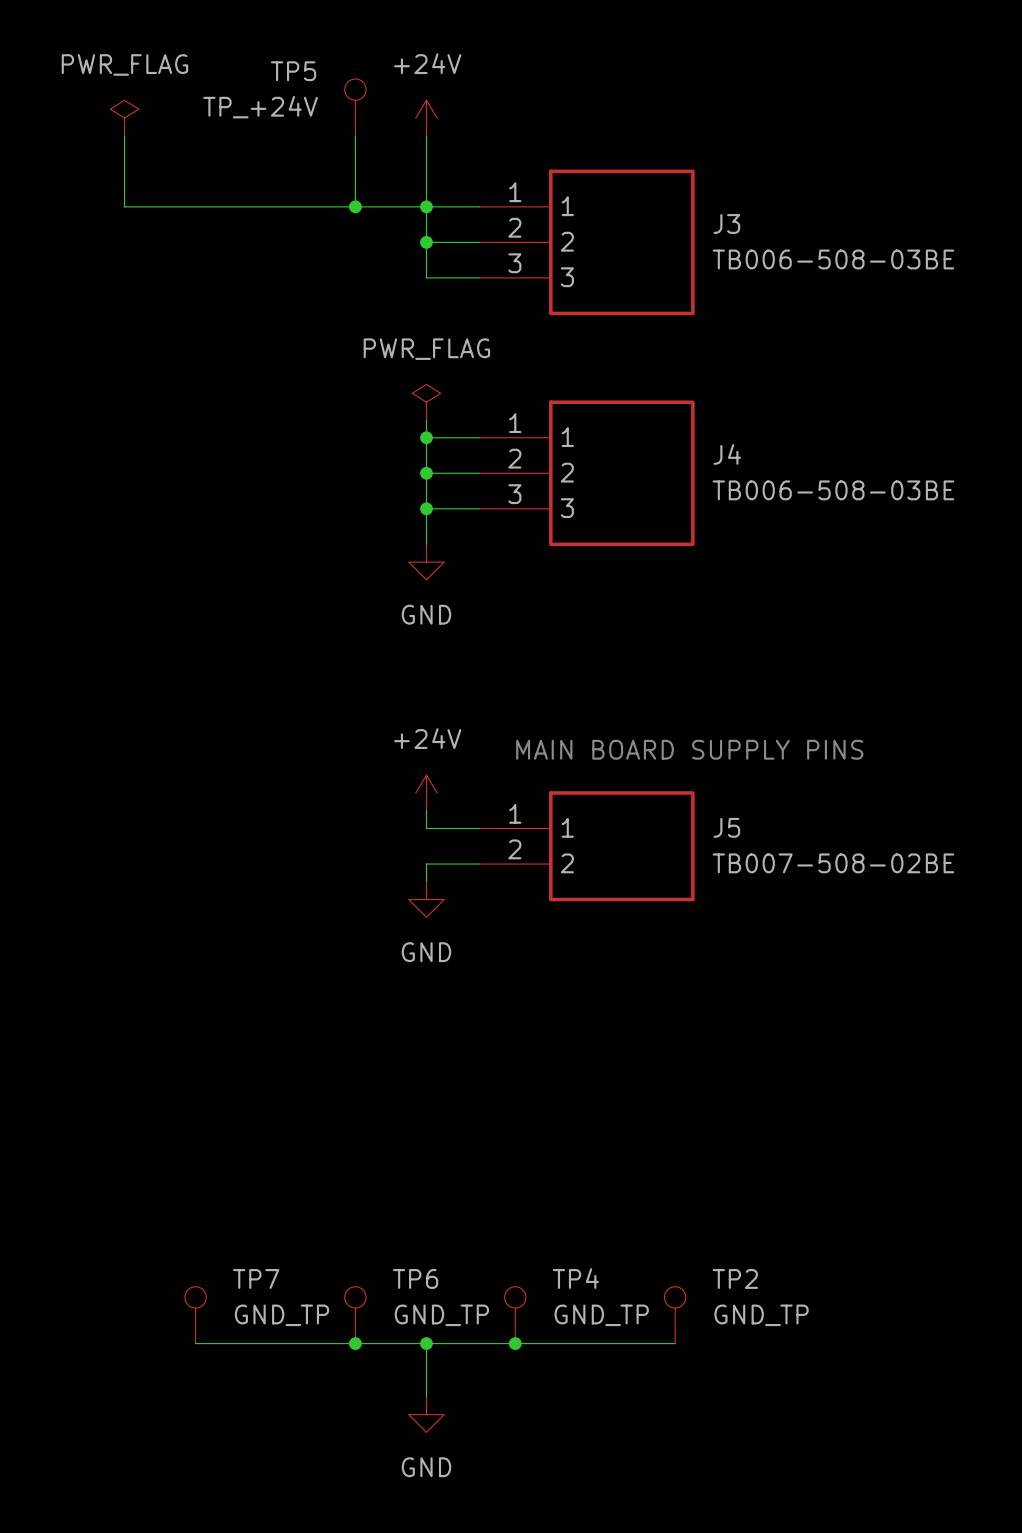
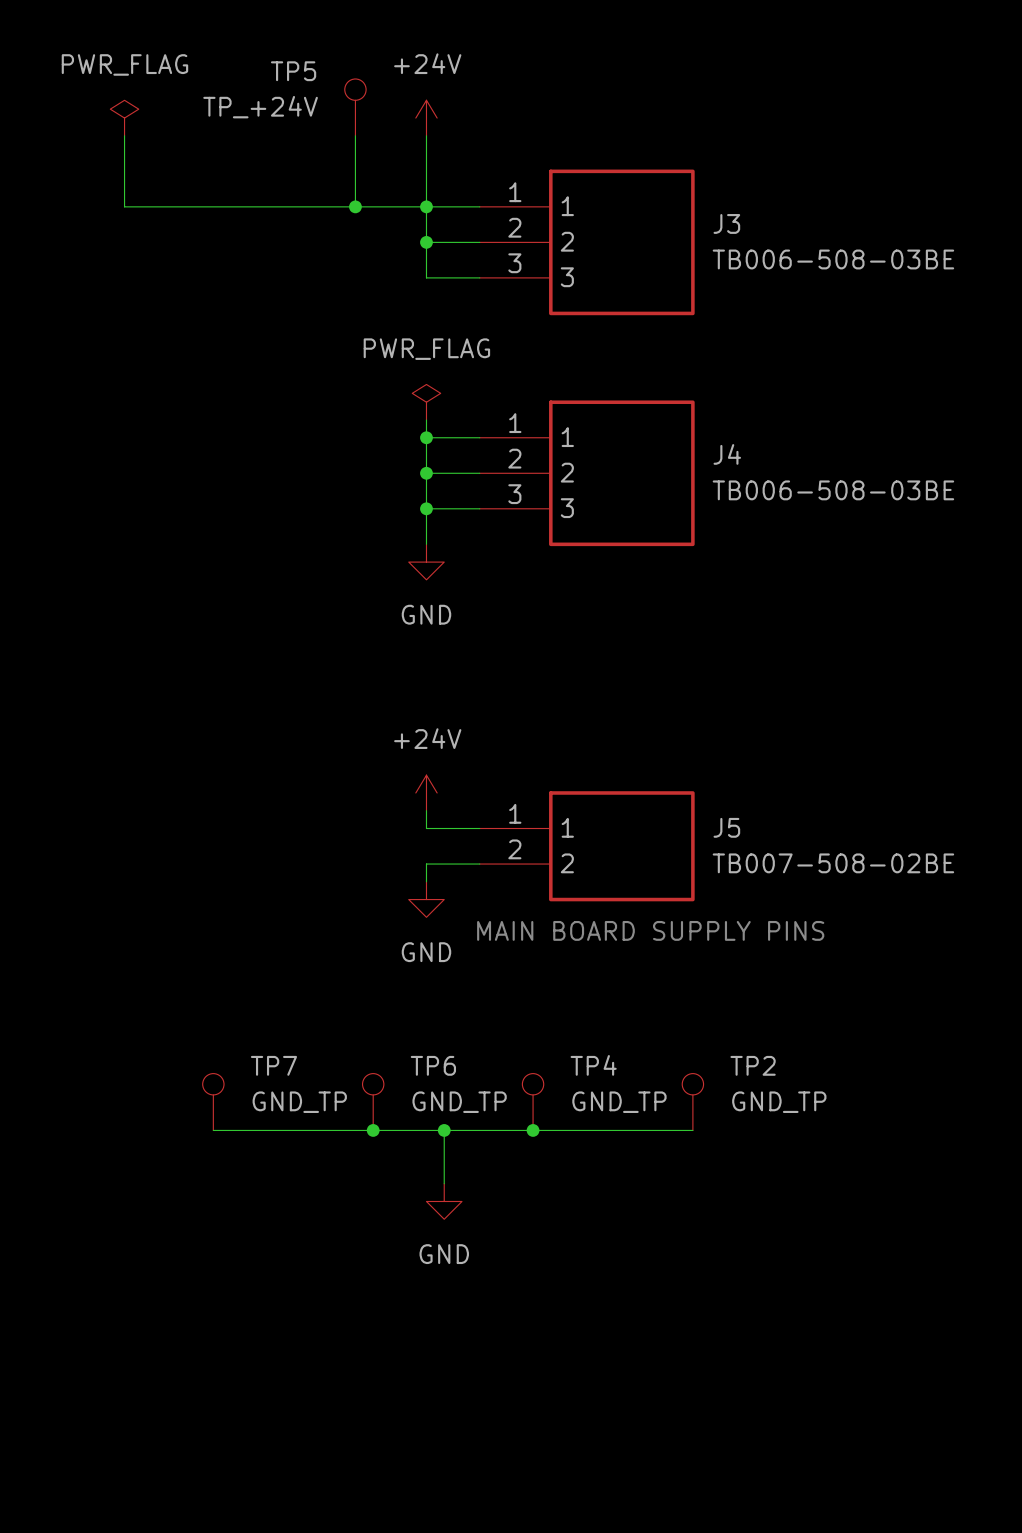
text position: MAIN BOARD SUPPLY PINS (689, 749) -> MAIN BOARD SUPPLY PINS (650, 930)
junction: none -> (373, 1130)
junction: none -> (444, 1130)
junction: none -> (533, 1130)
TP7 position: (195, 1315) -> (213, 1102)
TP6 position: (355, 1315) -> (373, 1102)
TP4 position: (515, 1315) -> (533, 1102)
TP2 position: (675, 1315) -> (692, 1102)
wire: (195, 1343) (675, 1343) -> (213, 1130) (692, 1130)
junction: (355, 1343) -> none
wire: (426, 1343) (426, 1396) -> (444, 1130) (444, 1183)
junction: (426, 1343) -> none
junction: (515, 1343) -> none
power symbol position: GND (426, 1414) -> GND (444, 1201)

